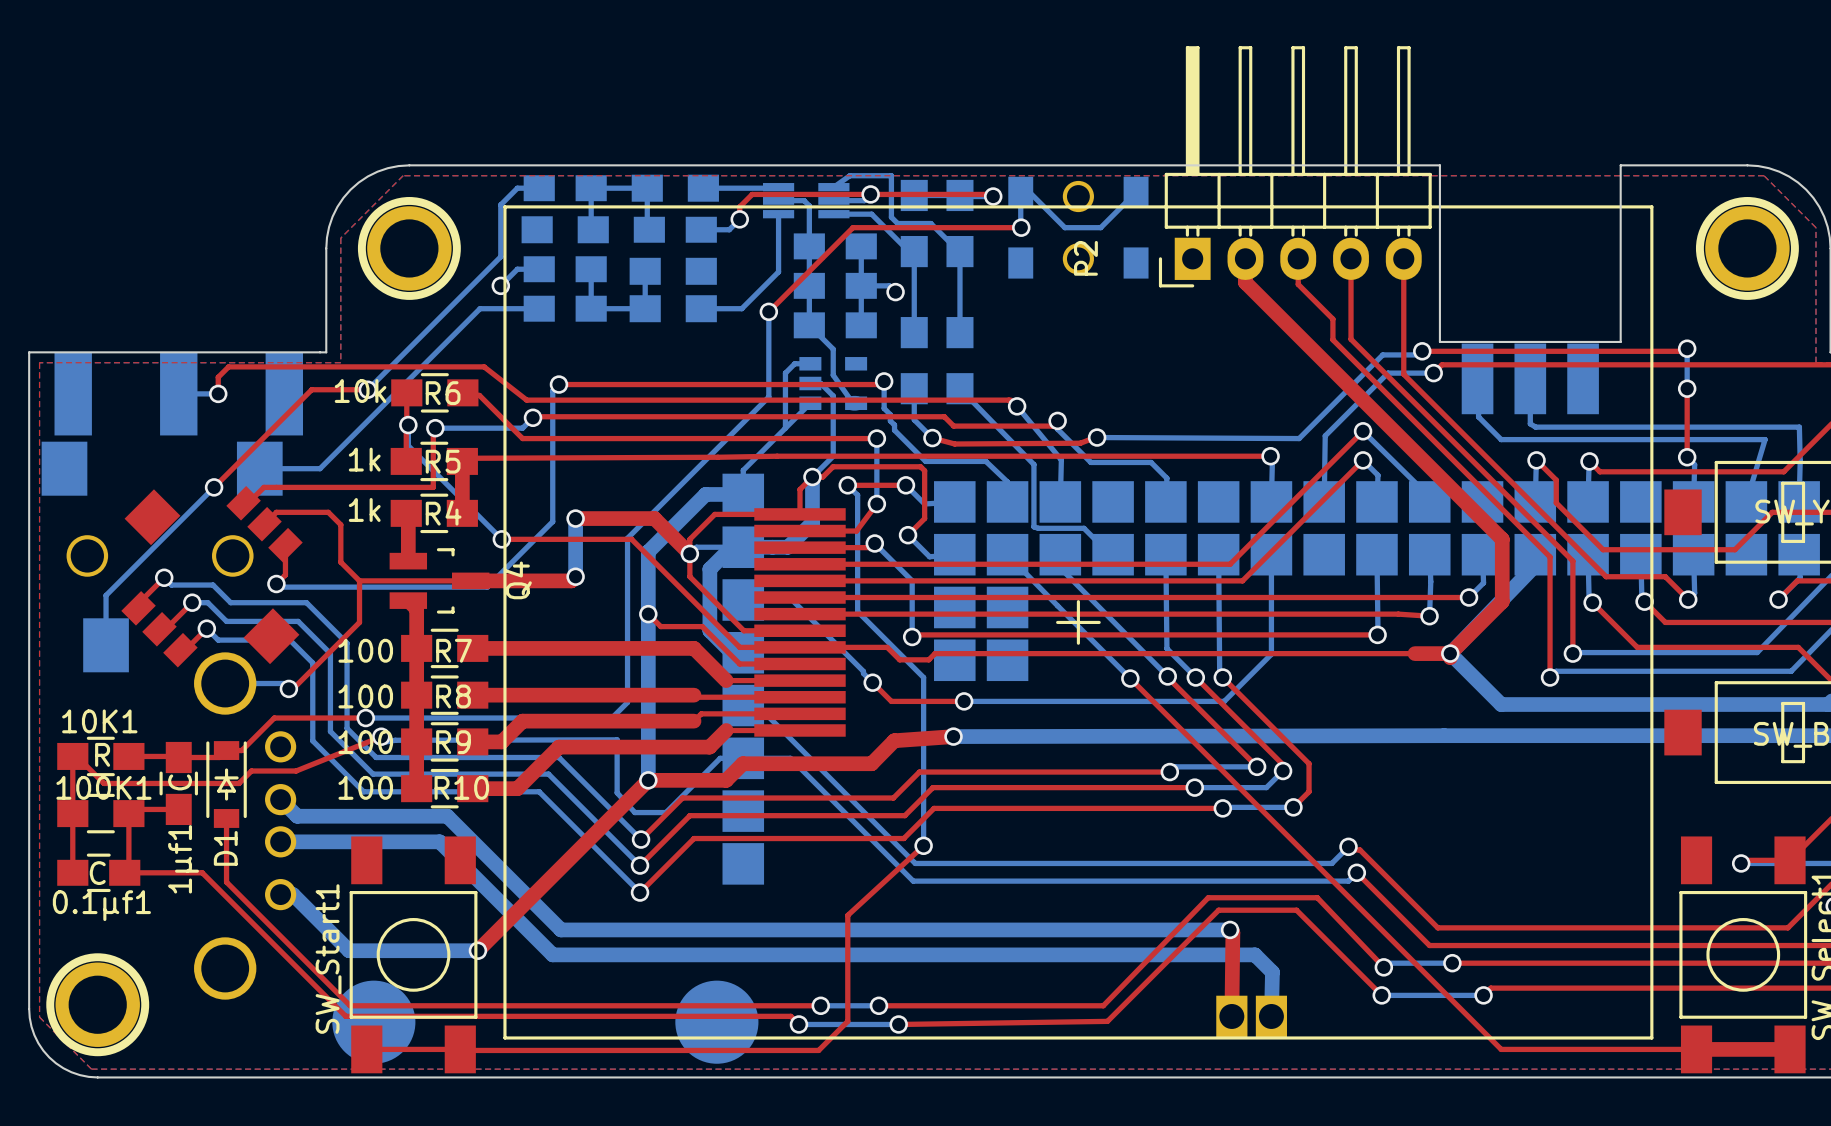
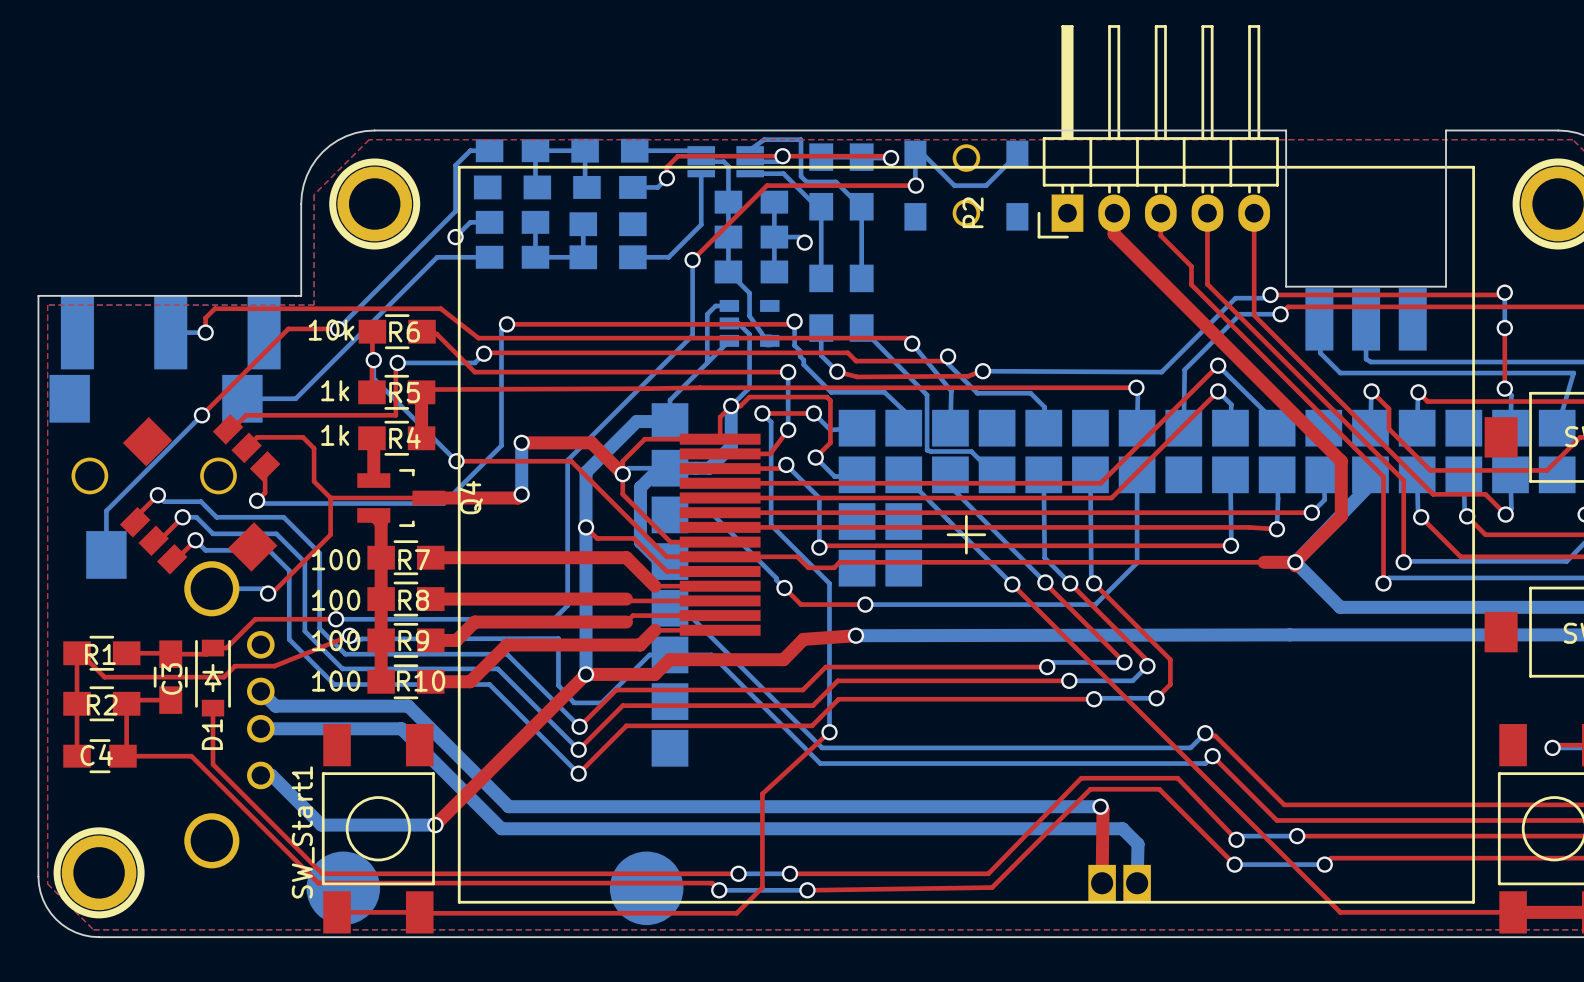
10K1 name: 10K1 (99, 721) -> R1 (100, 654)
10K1 value: R (102, 754) -> none
1µf1 value: C (180, 782) -> none
100K1 name: 100K1 (103, 787) -> R2 (102, 704)
1µf1 name: 1µf1 (183, 859) -> C3 (171, 679)
0.1µf1 value: C (97, 873) -> none
0.1µf1 name: 0.1µf1 (101, 905) -> C4 (96, 755)

